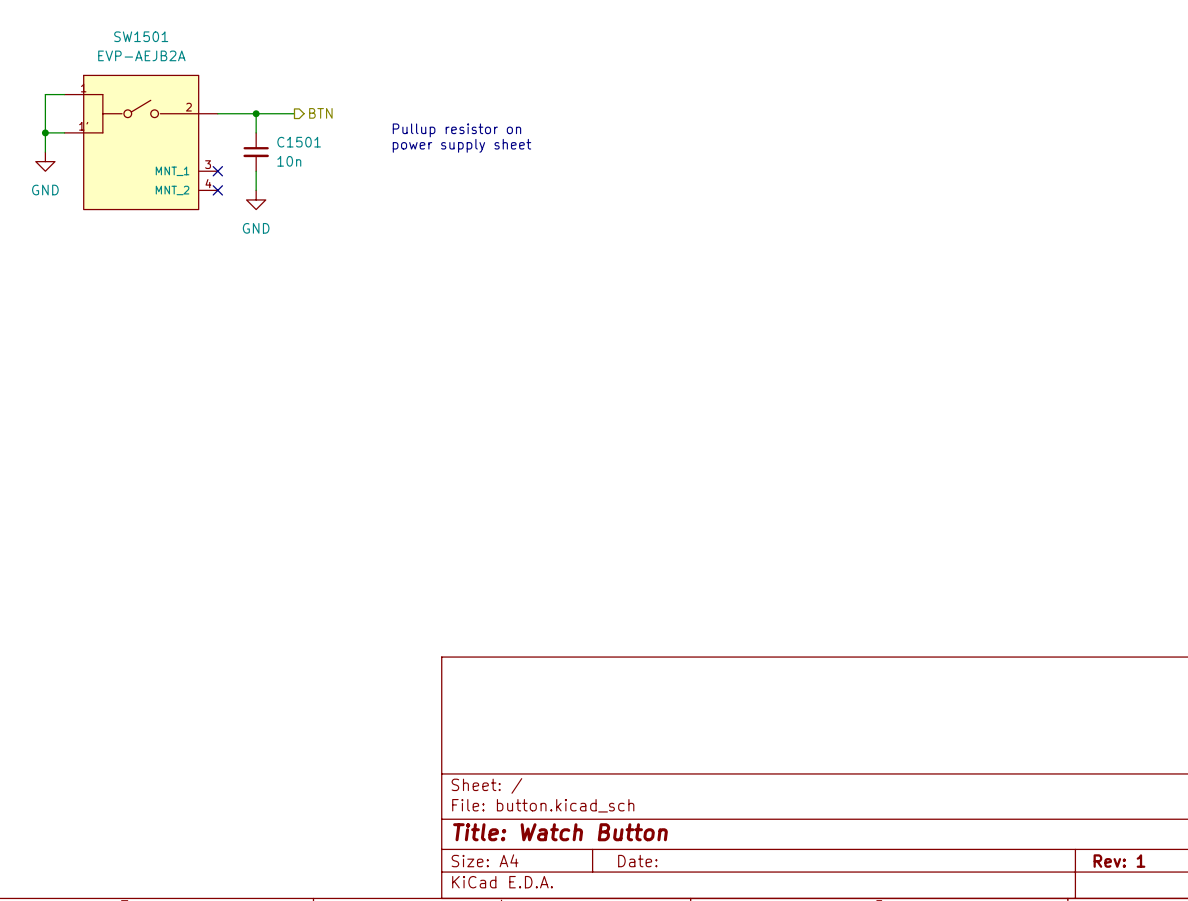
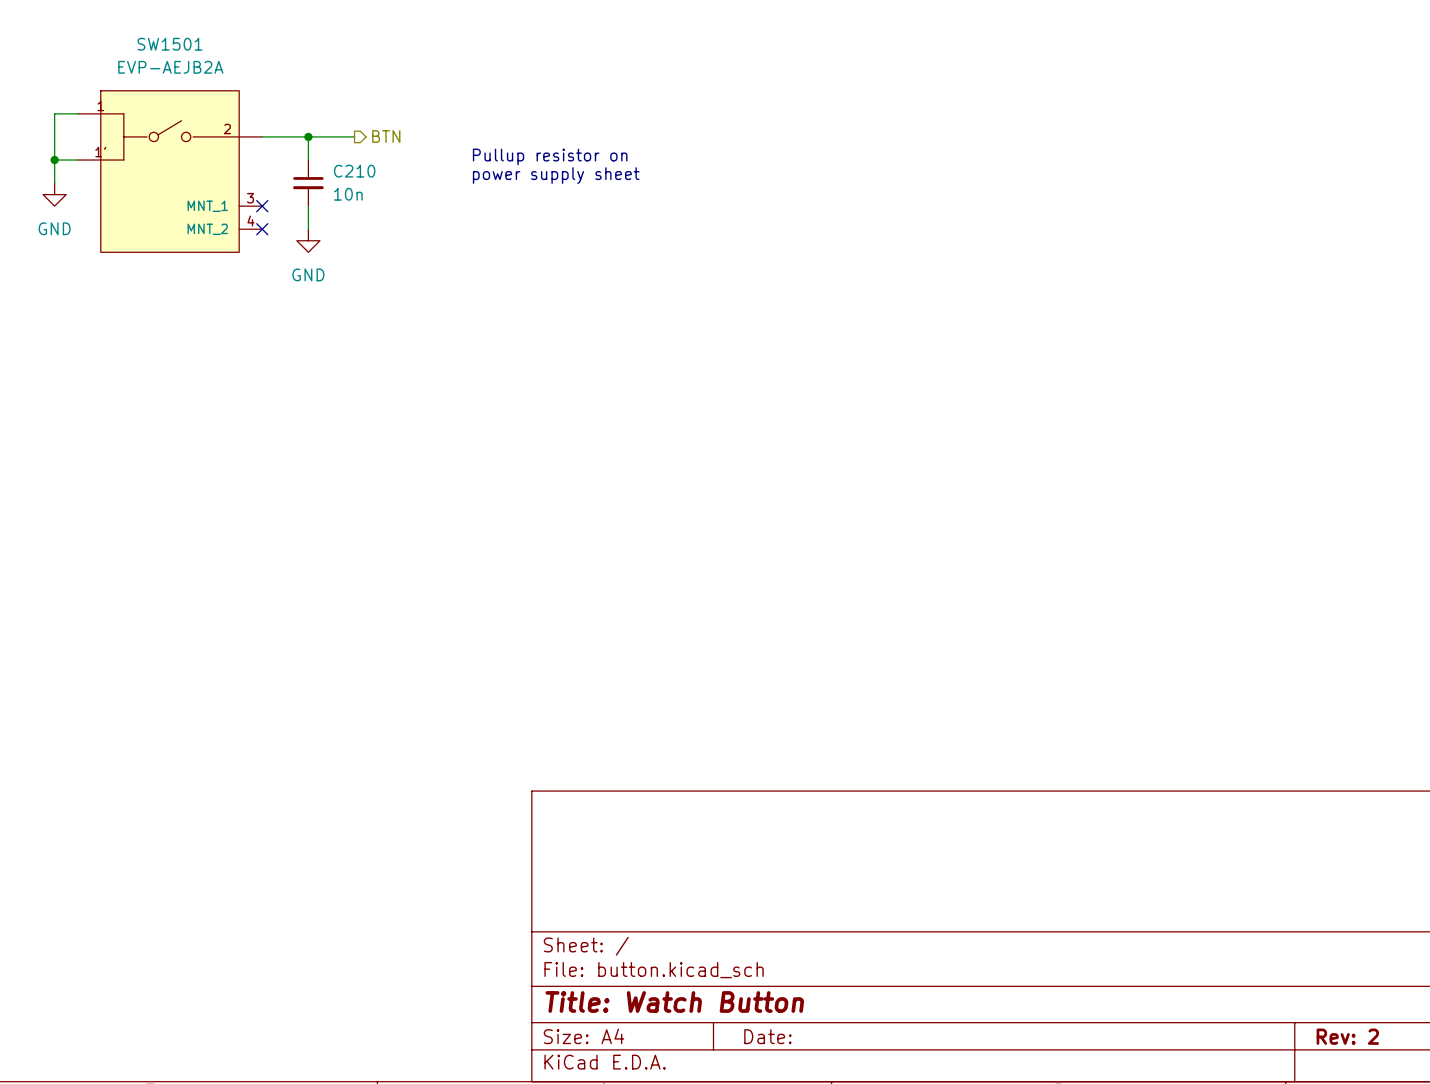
C1501 name: C1501 (299, 142) -> C210 (354, 171)
title block: Rev: 1 (1119, 861) -> Rev: 2 (1347, 1036)

